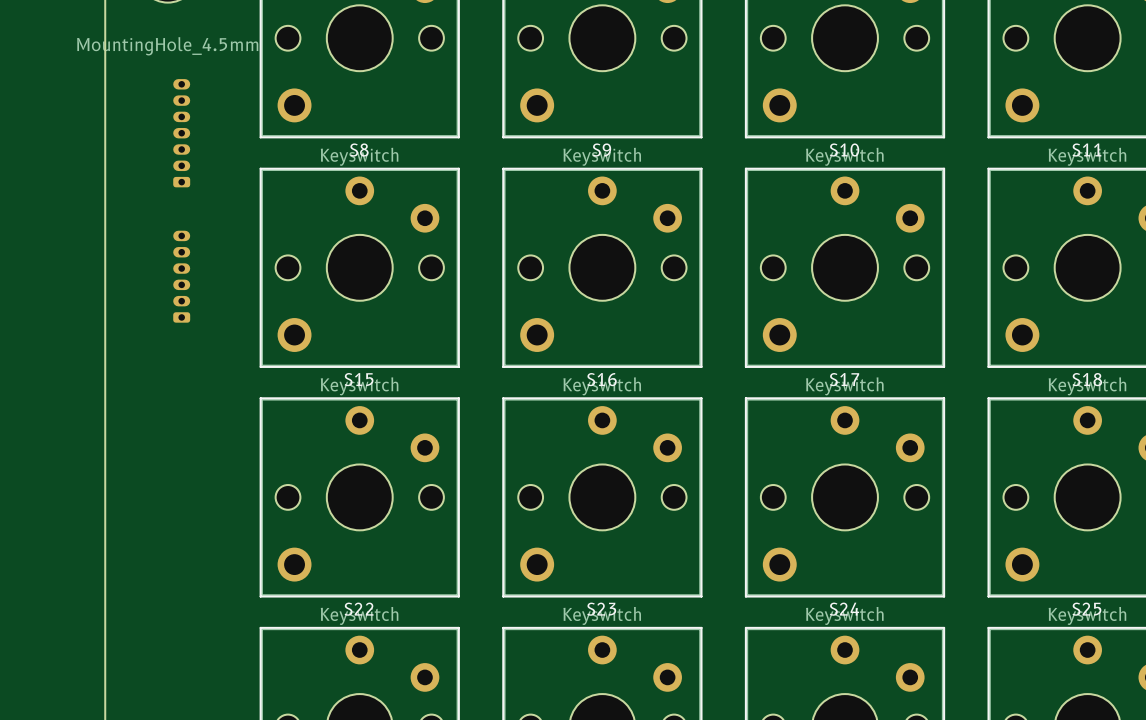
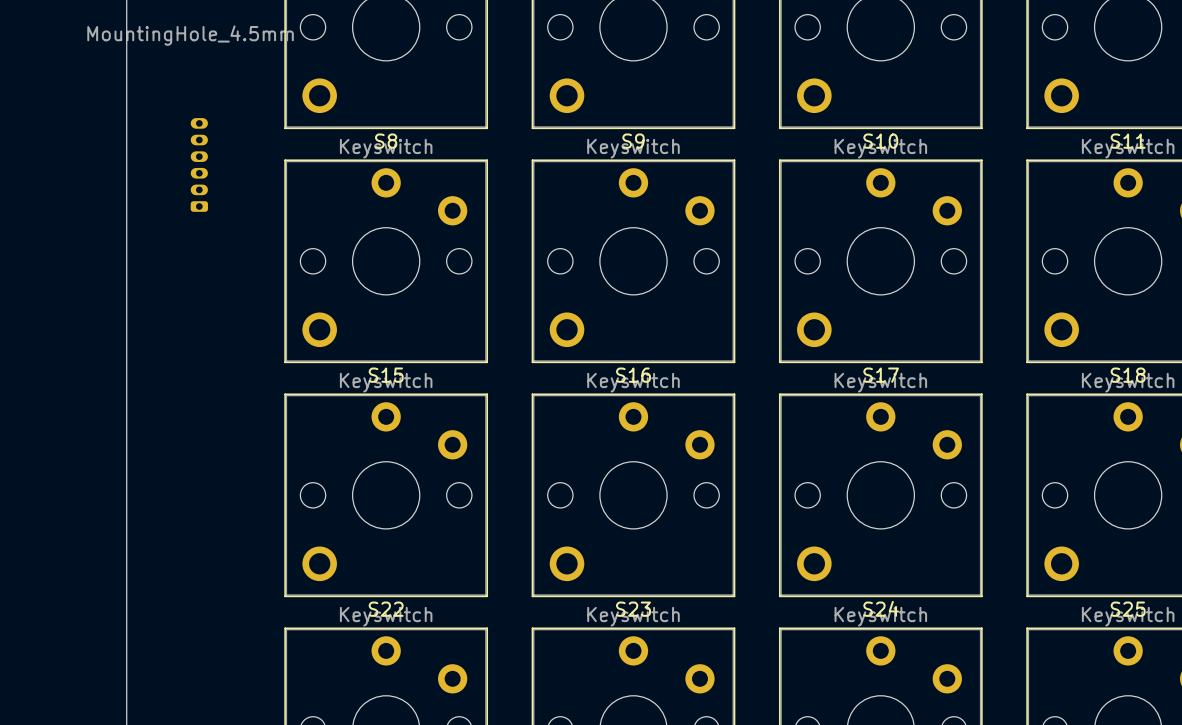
part: (181, 133) -> none
part position: (181, 276) -> (199, 164)

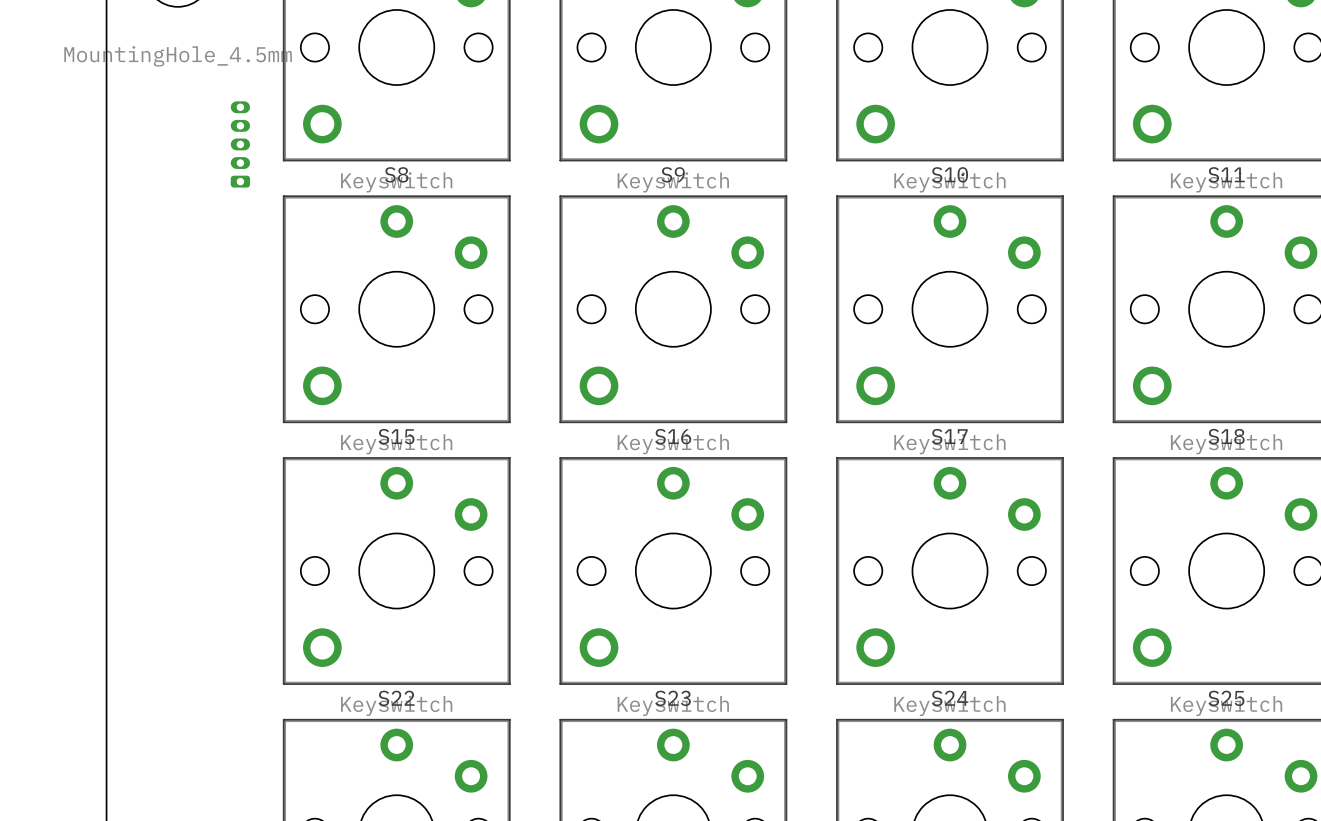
part: none -> (240, 144)
part: (199, 164) -> none

